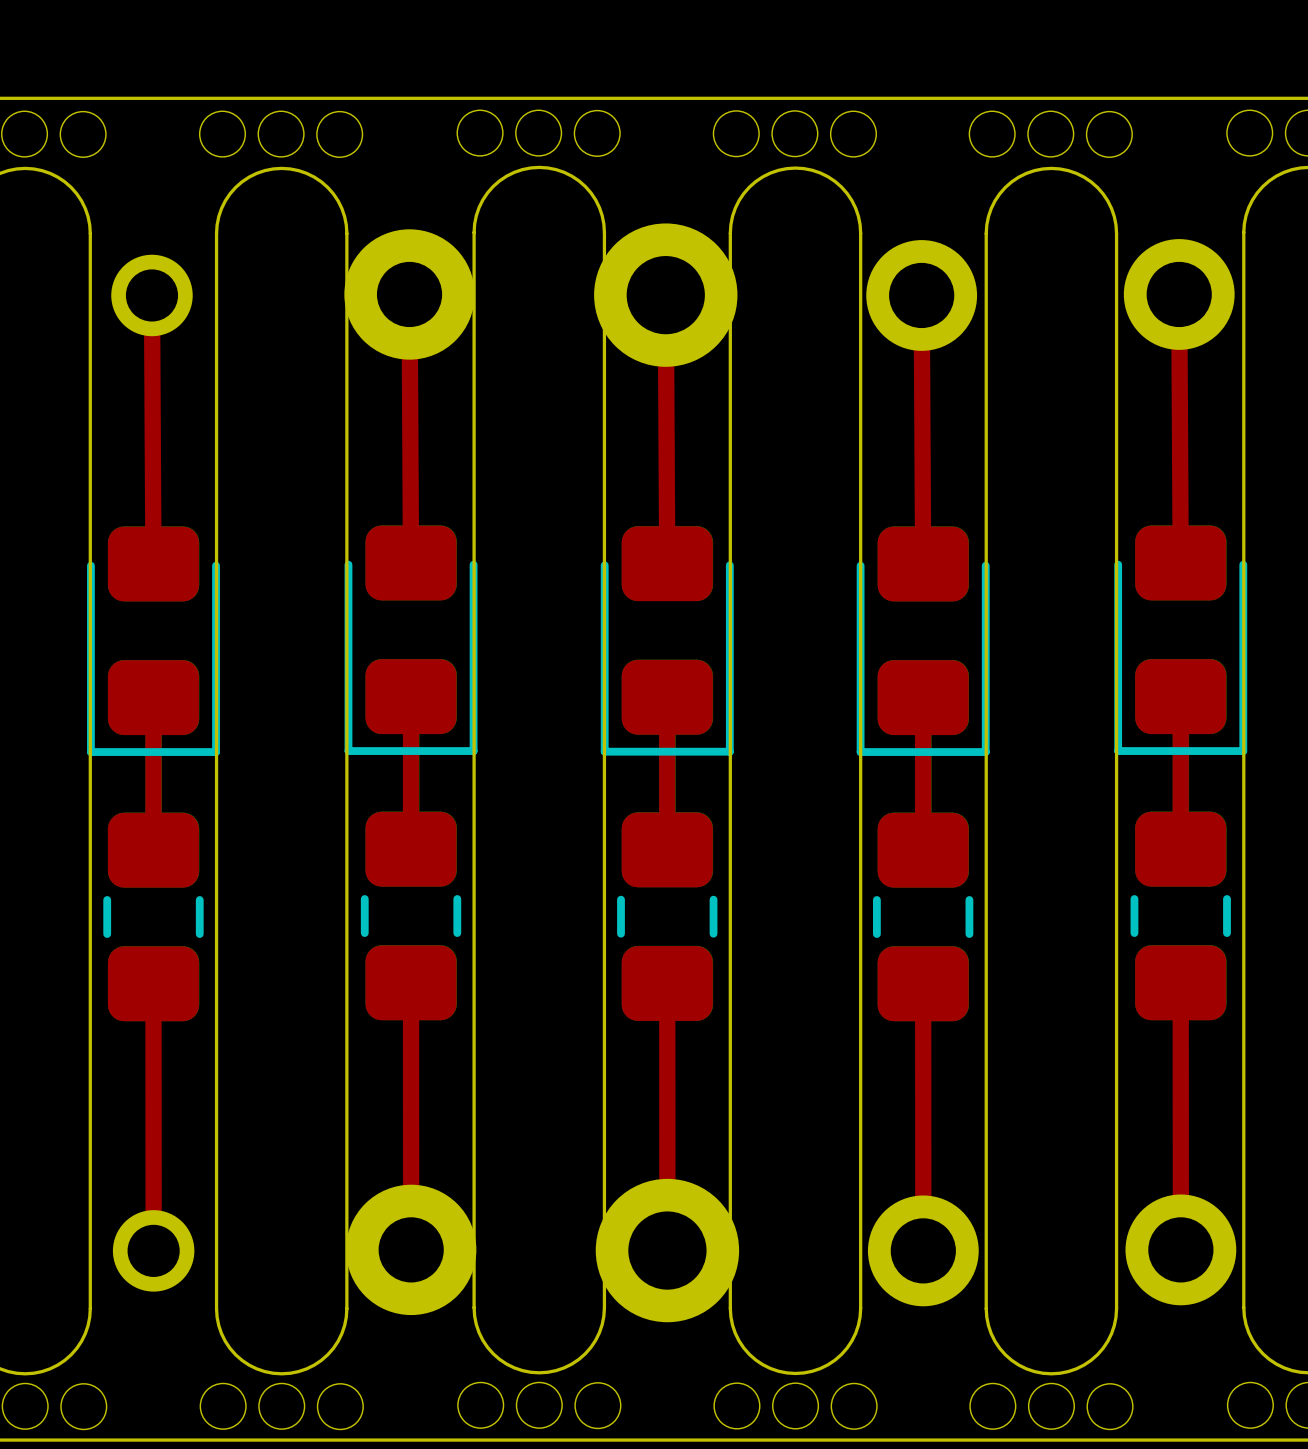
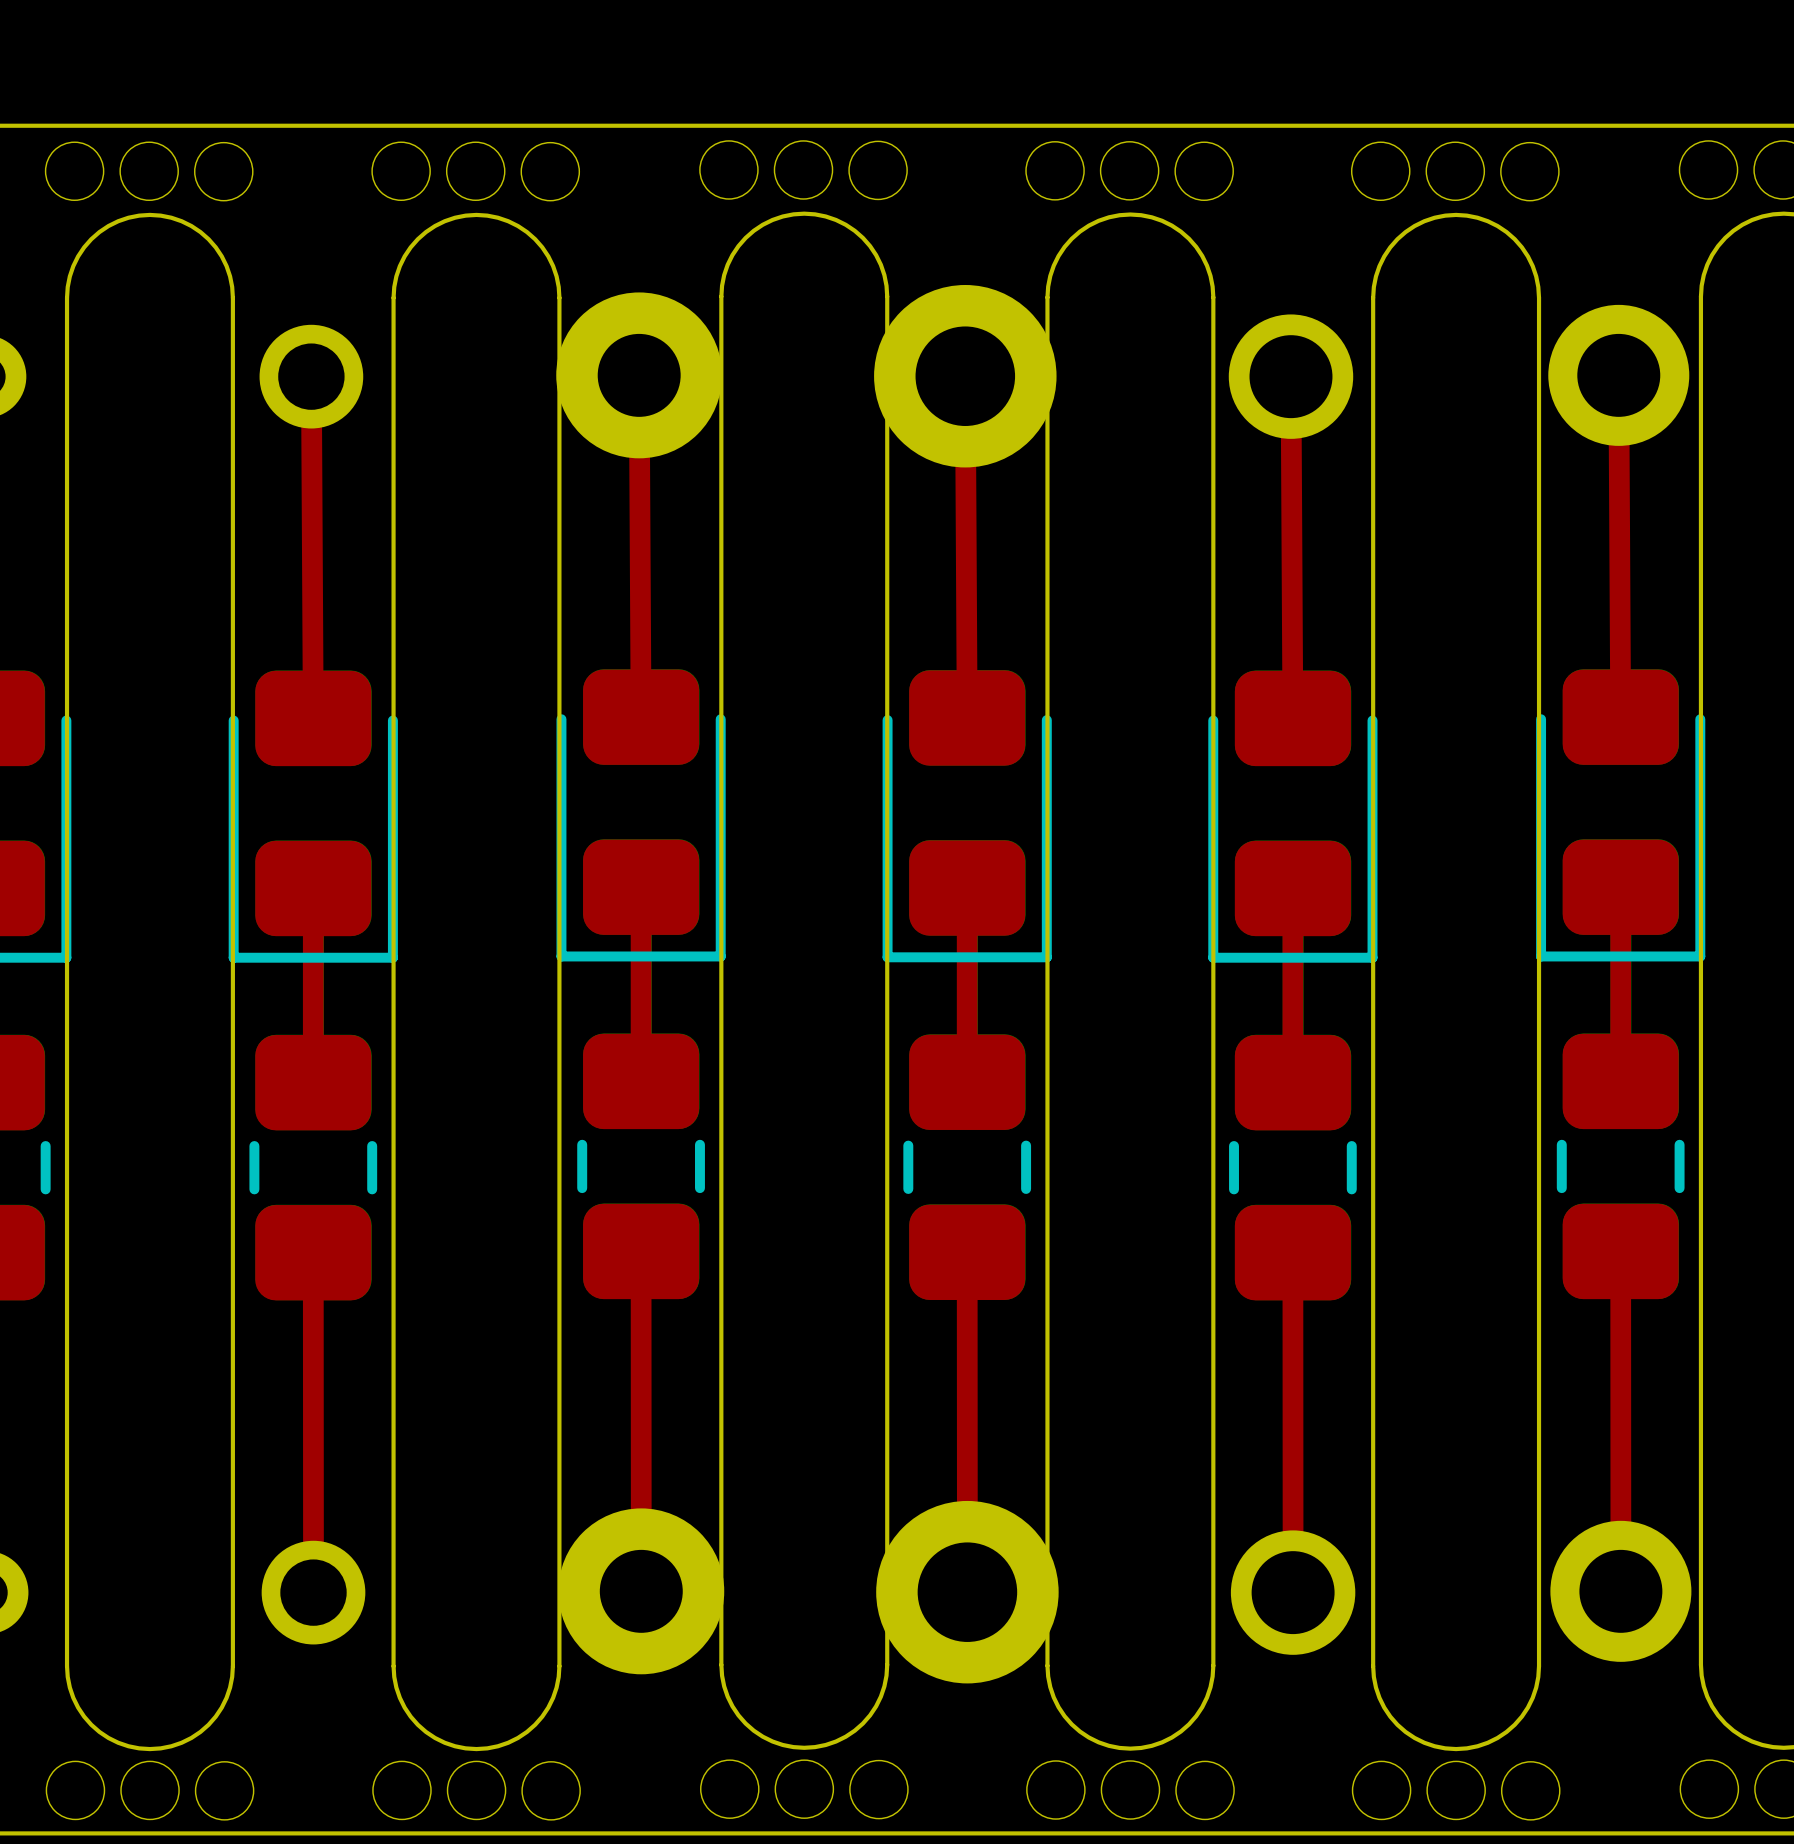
part footprint: [866, 240, 978, 351] -> [1228, 314, 1354, 439]
part footprint: [867, 1195, 979, 1307] -> [1230, 1530, 1356, 1655]

